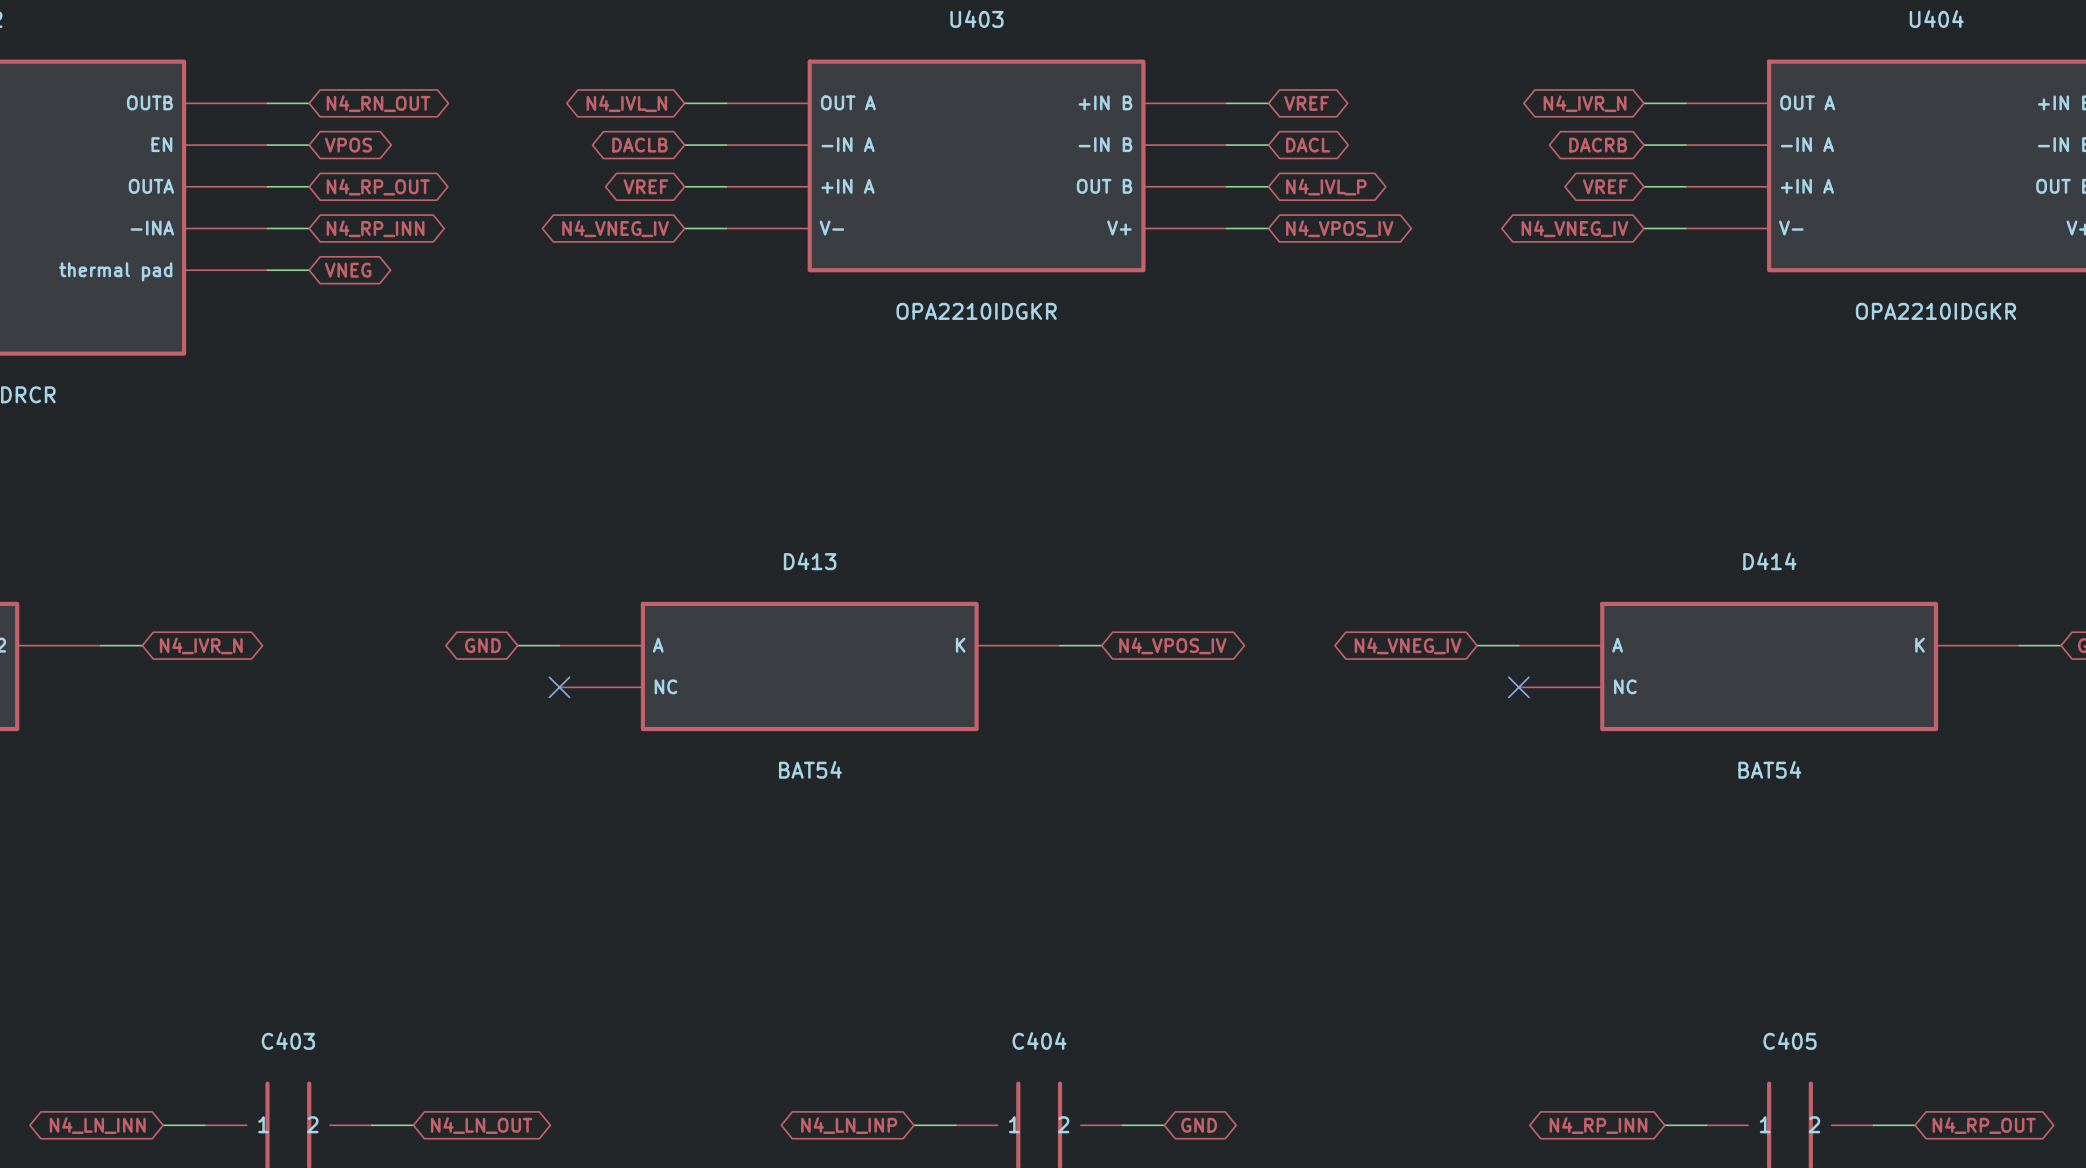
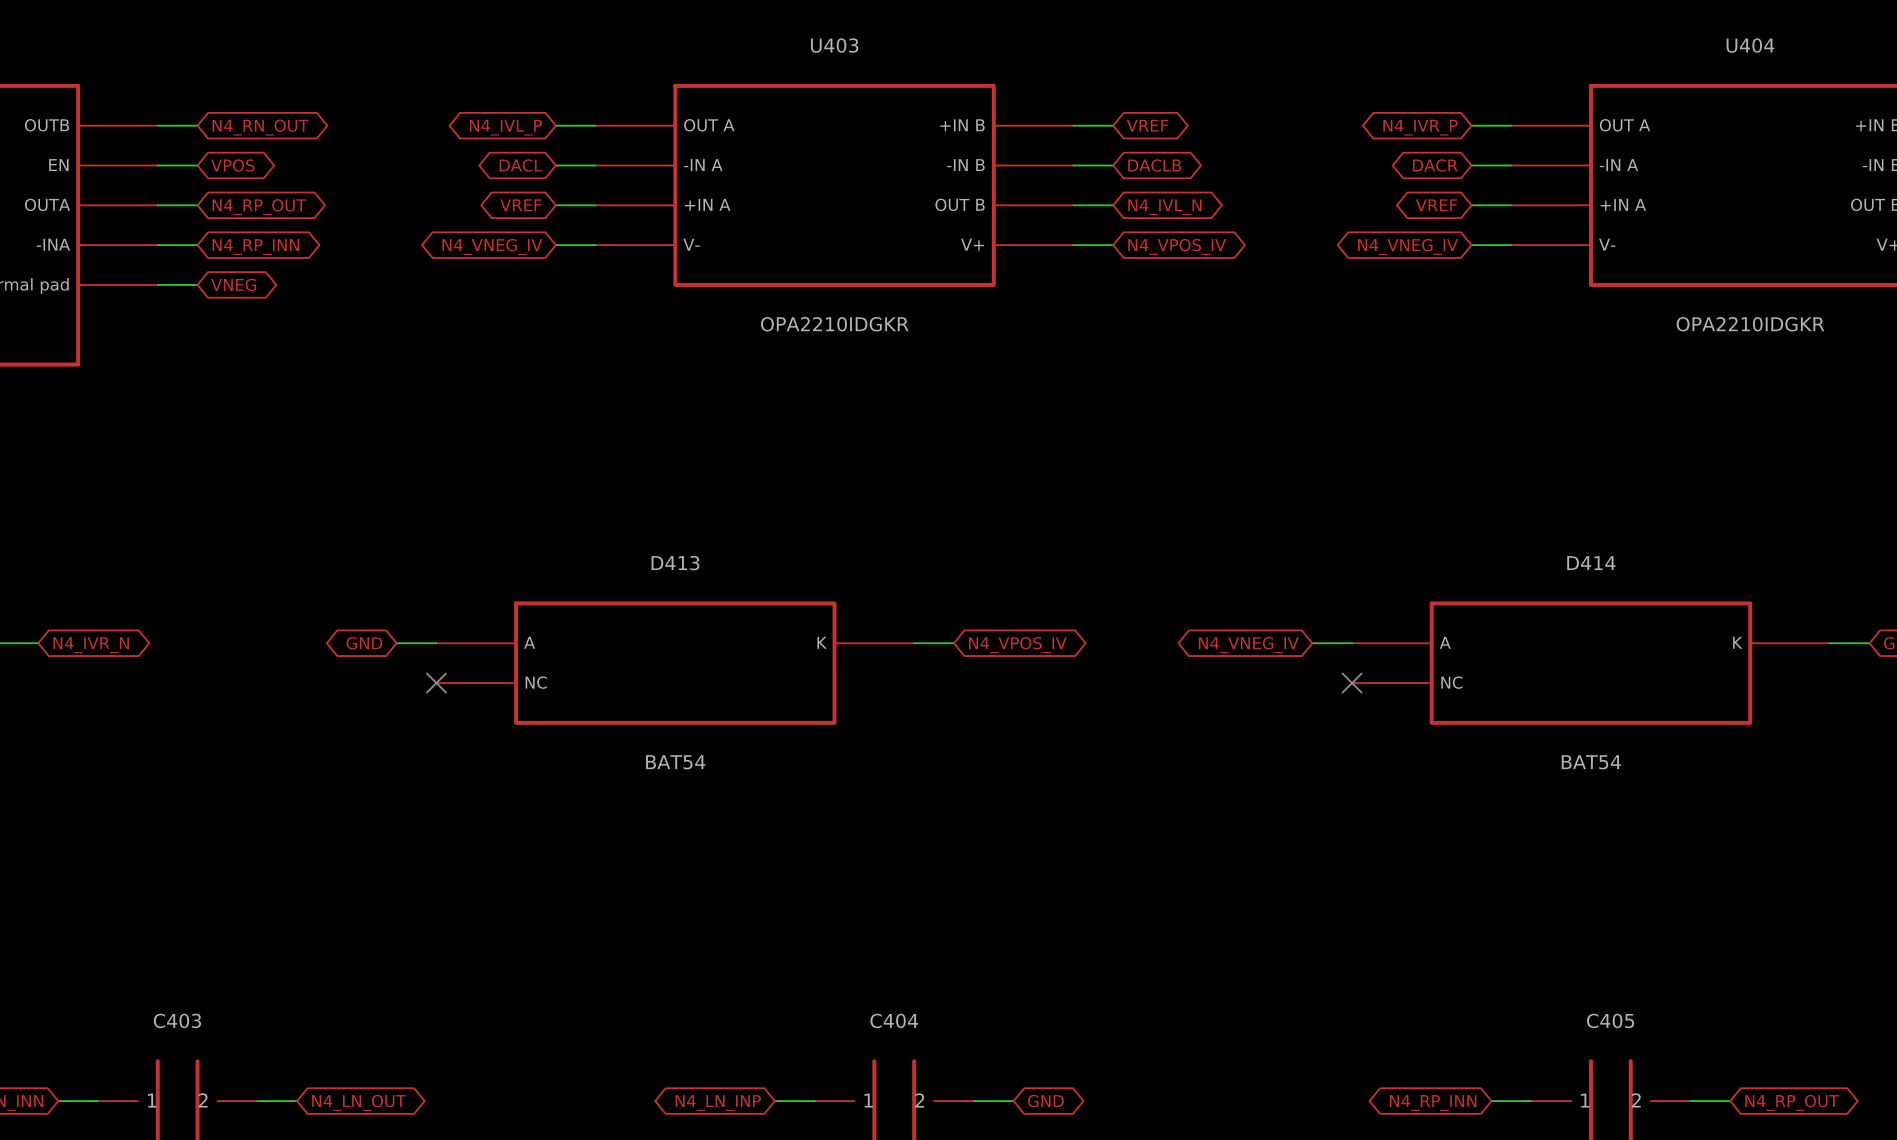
global label: N4_IVL_N (626, 103) -> N4_IVL_P (505, 127)
global label: N4_IVR_N (1585, 103) -> N4_IVR_P (1420, 127)
global label: DACLB (639, 145) -> DACL (520, 165)
global label: DACL (1308, 145) -> DACLB (1154, 165)
global label: DACRB (1598, 145) -> DACR (1435, 165)
global label: N4_IVL_P (1326, 187) -> N4_IVL_N (1164, 207)

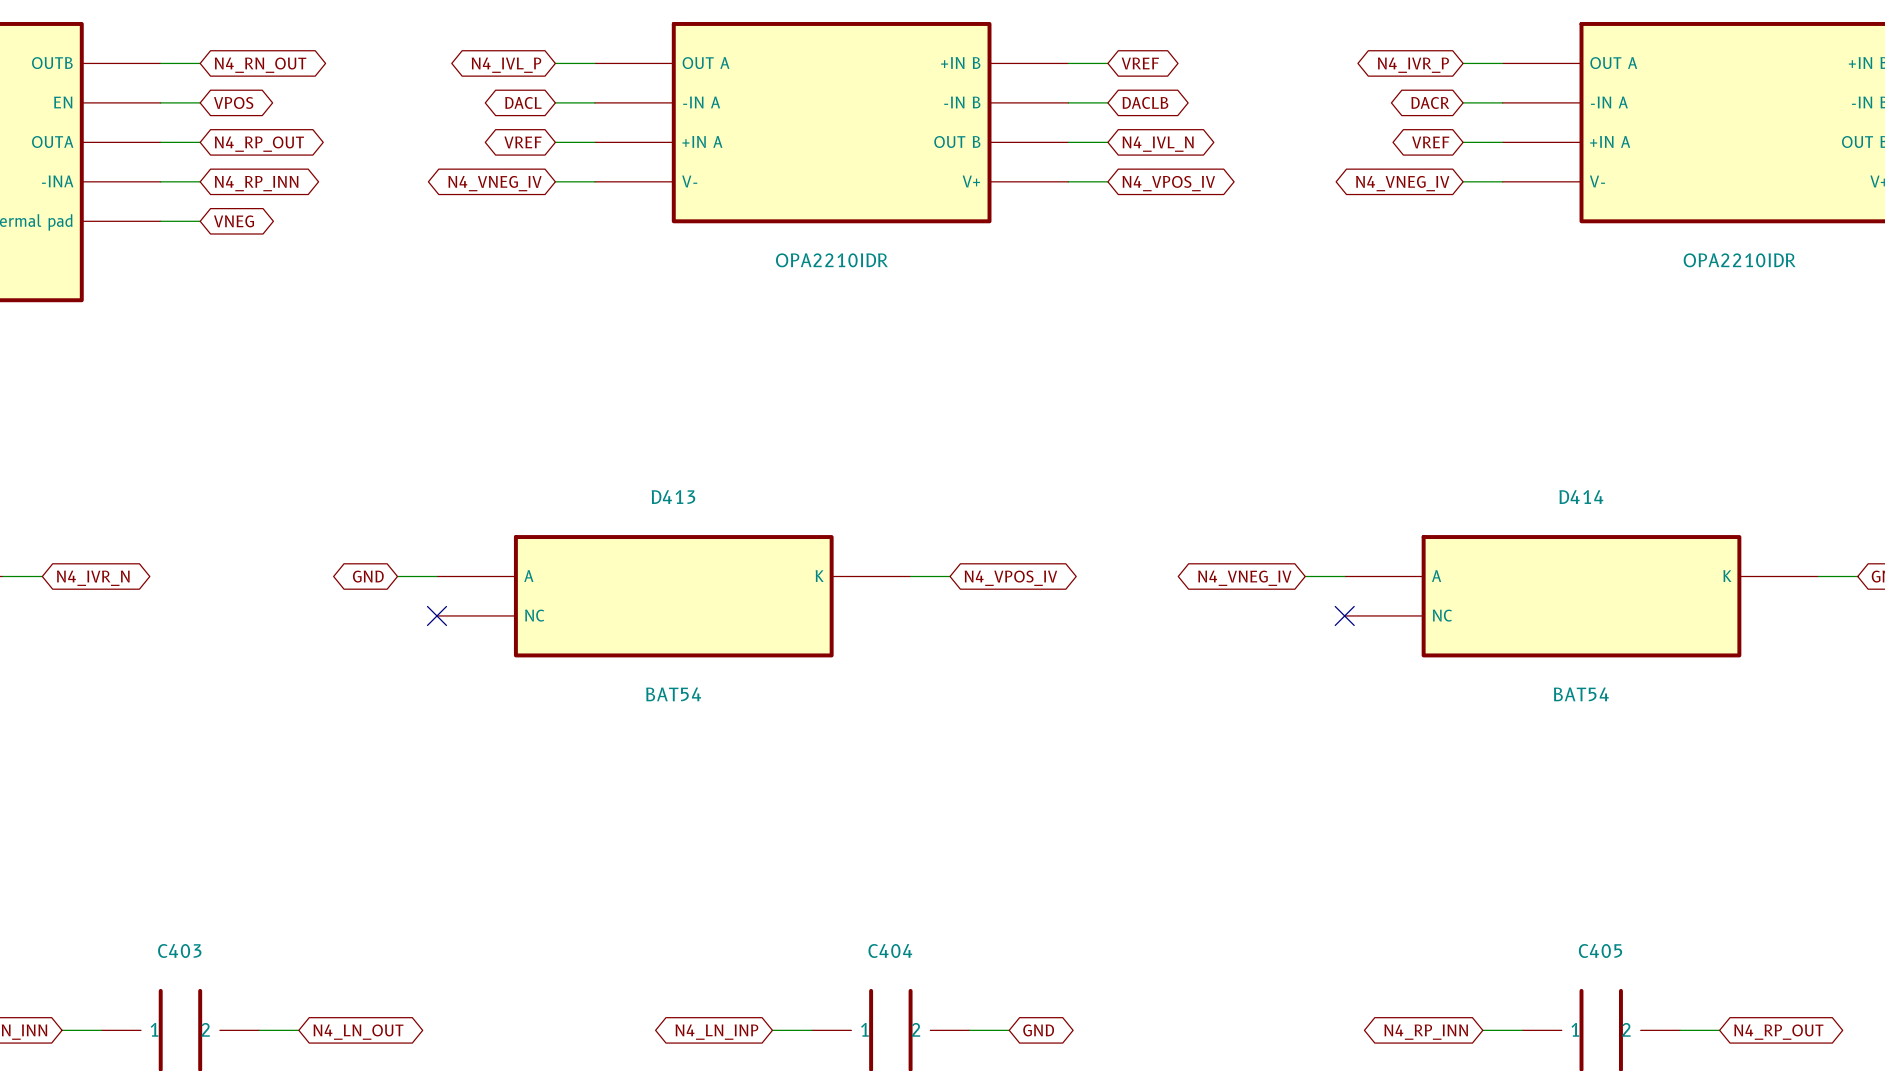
U403 value: OPA2210IDGKR (834, 324) -> OPA2210IDR (831, 260)
U404 value: OPA2210IDGKR (1750, 324) -> OPA2210IDR (1739, 260)

